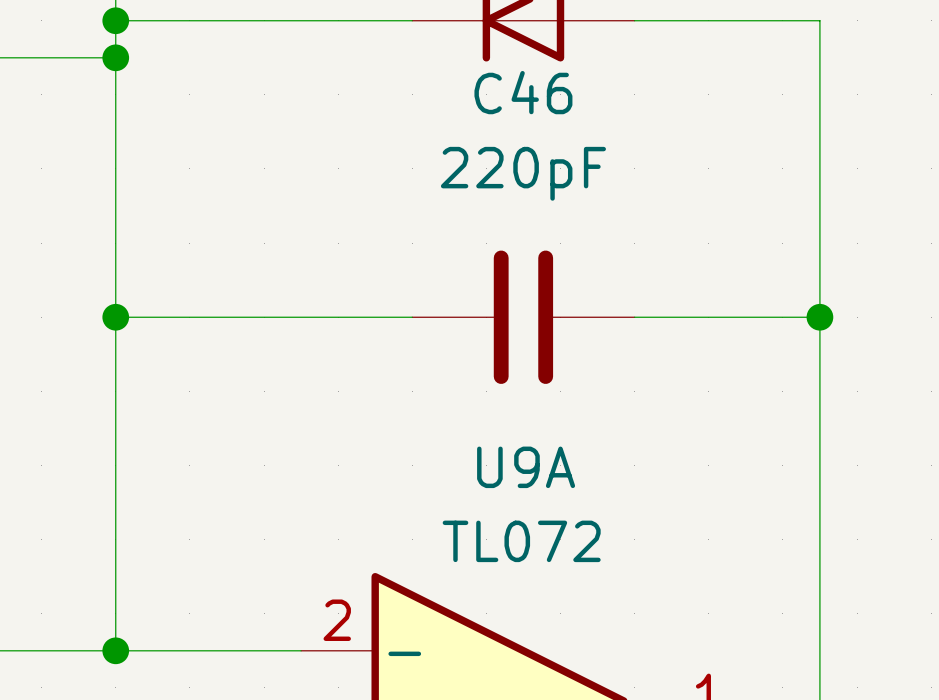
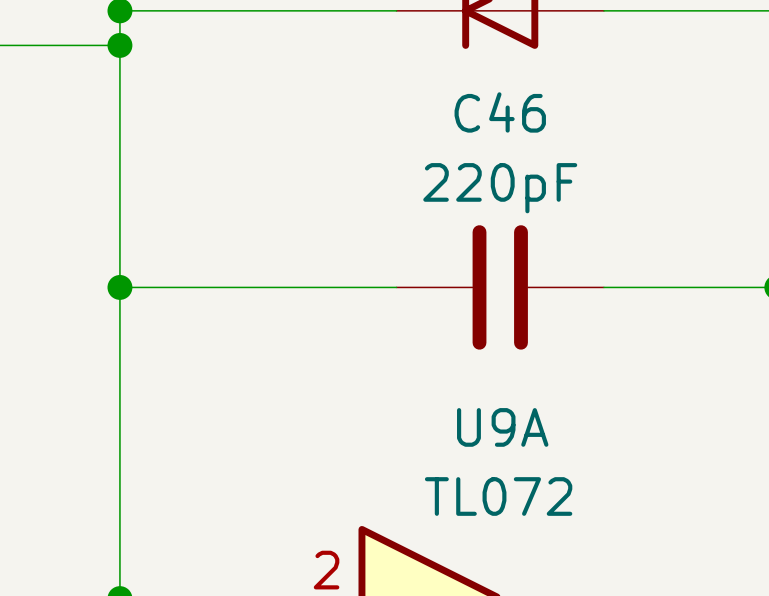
C46 name position: C46 (523, 92) -> C46 (500, 112)
C46 value position: 220pF (523, 173) -> 220pF (500, 188)

